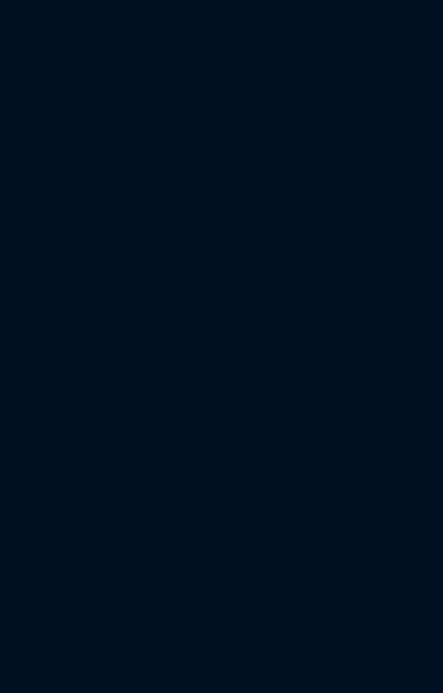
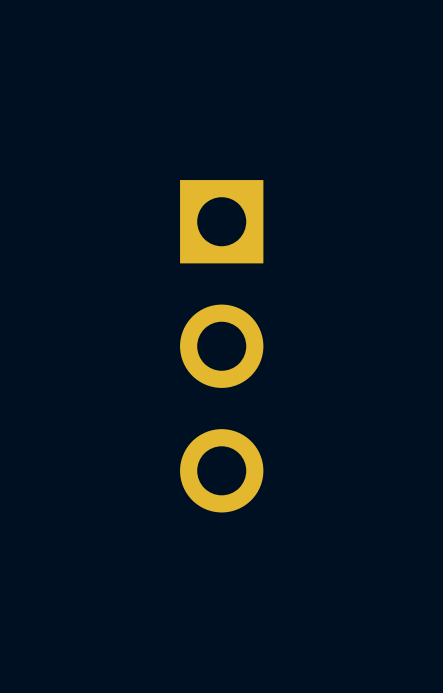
part: none -> (221, 346)

